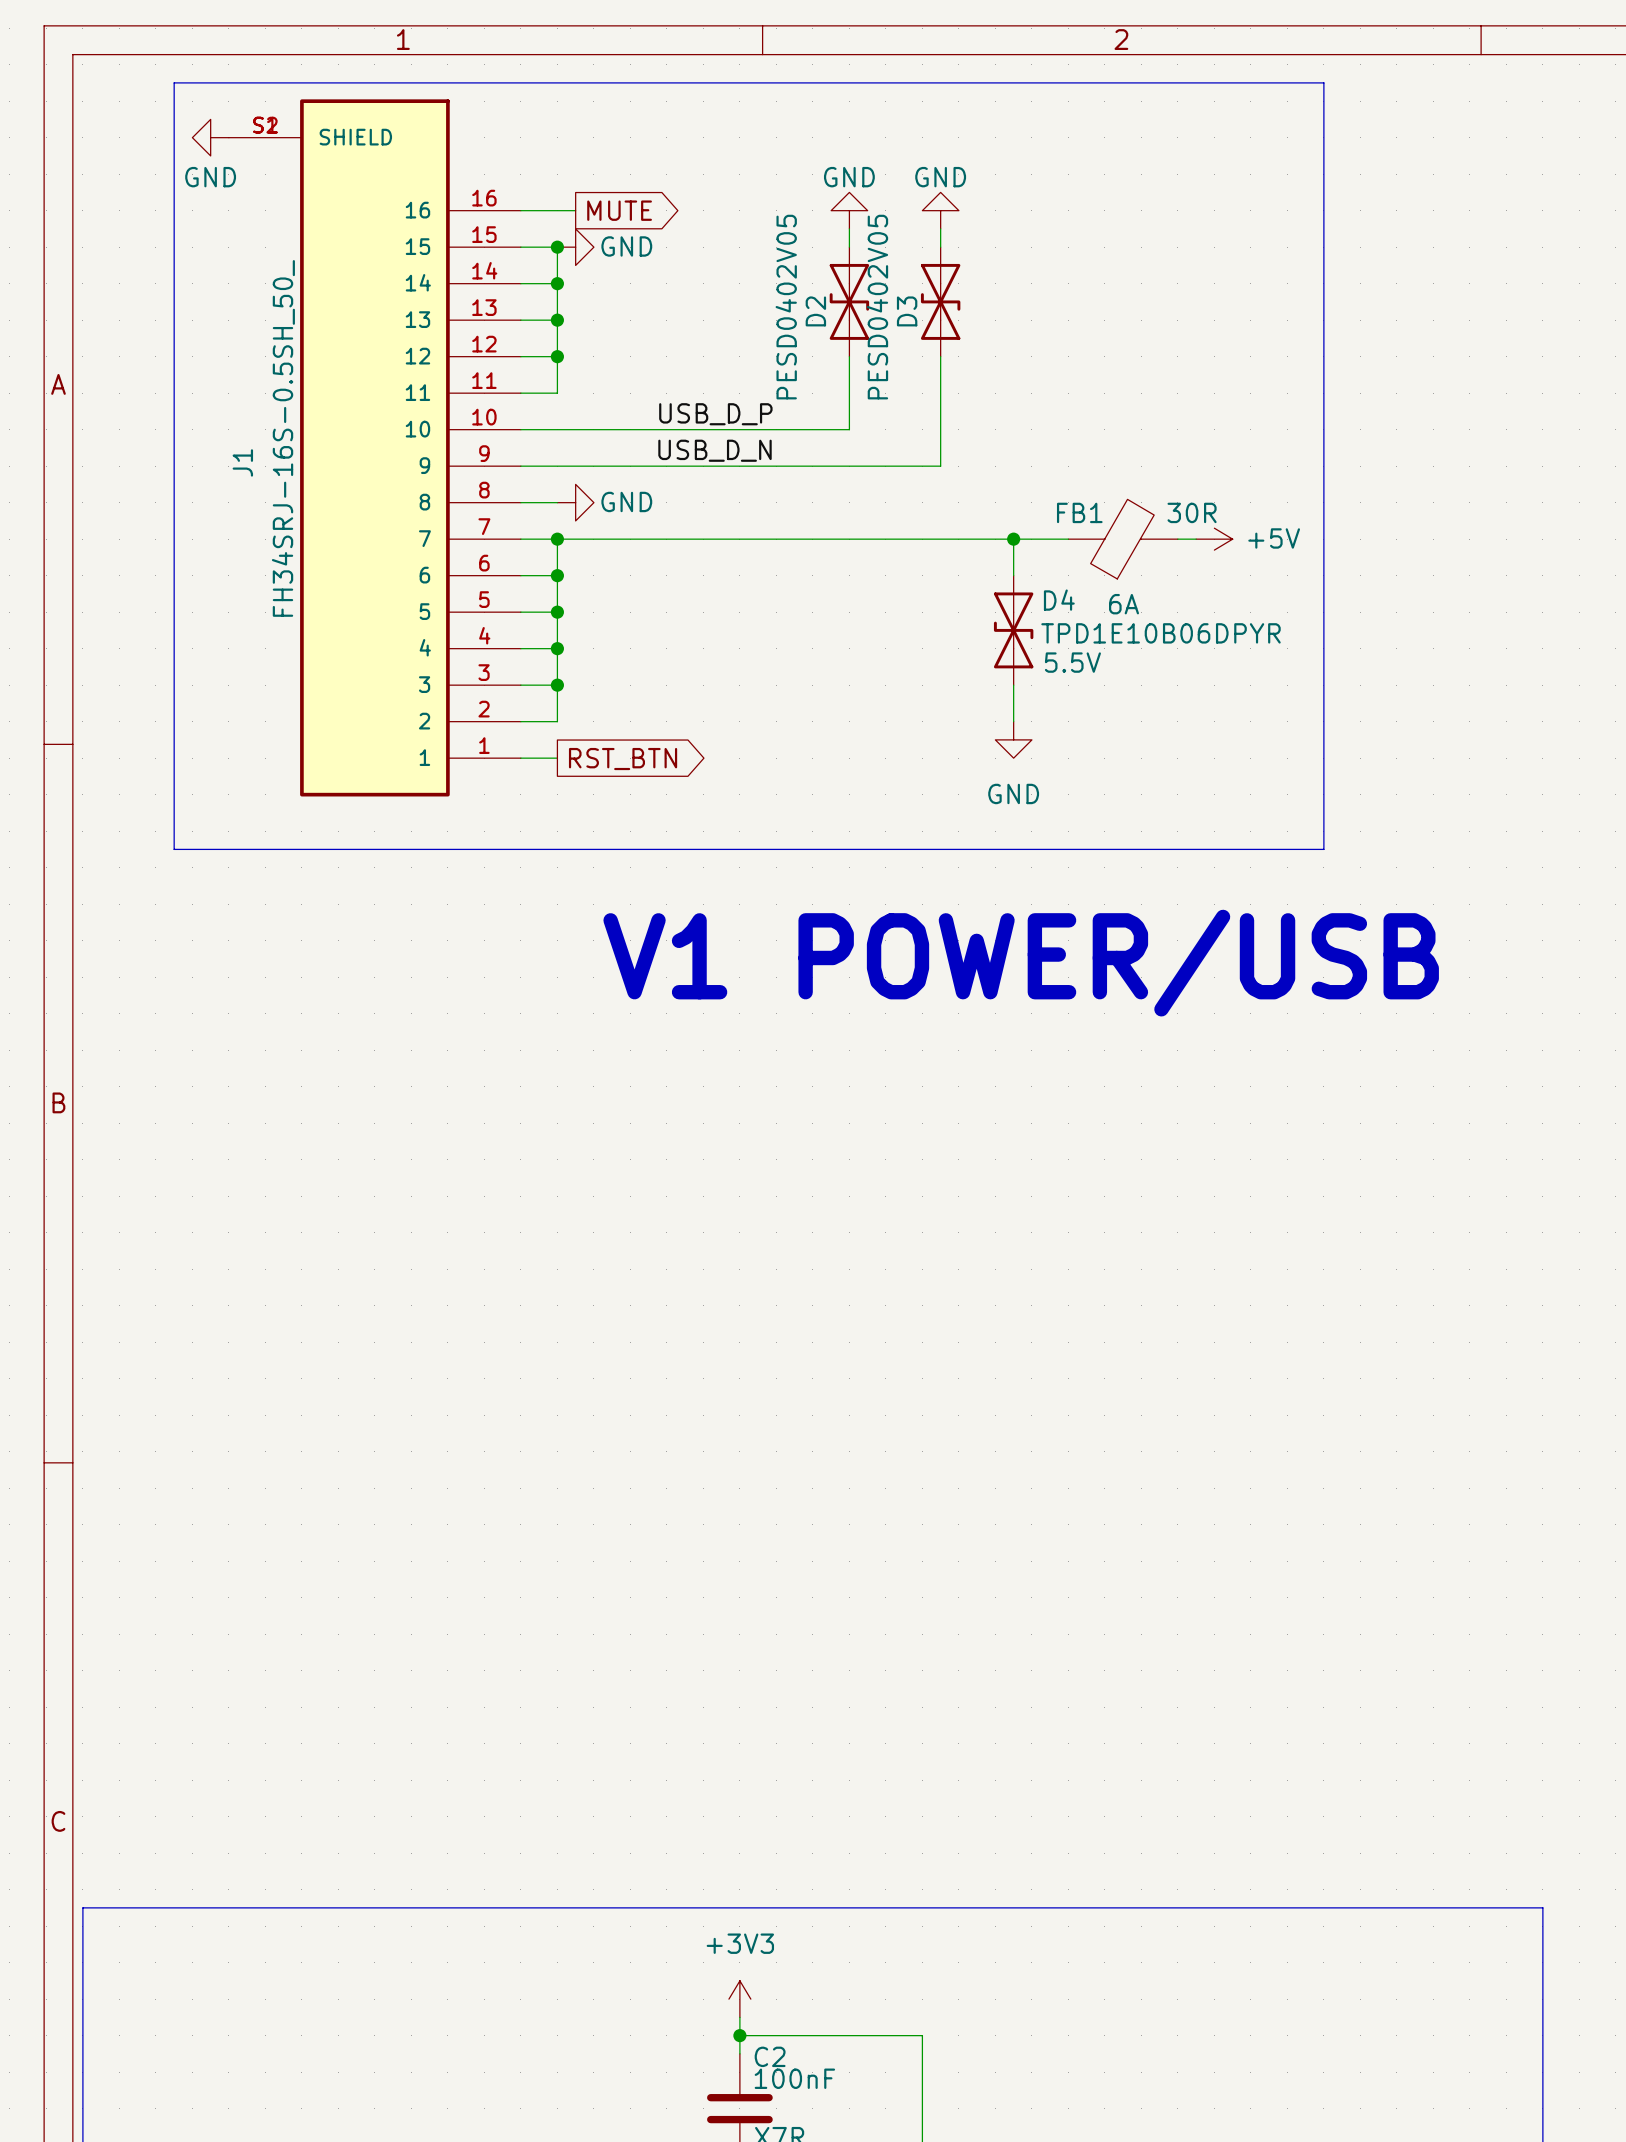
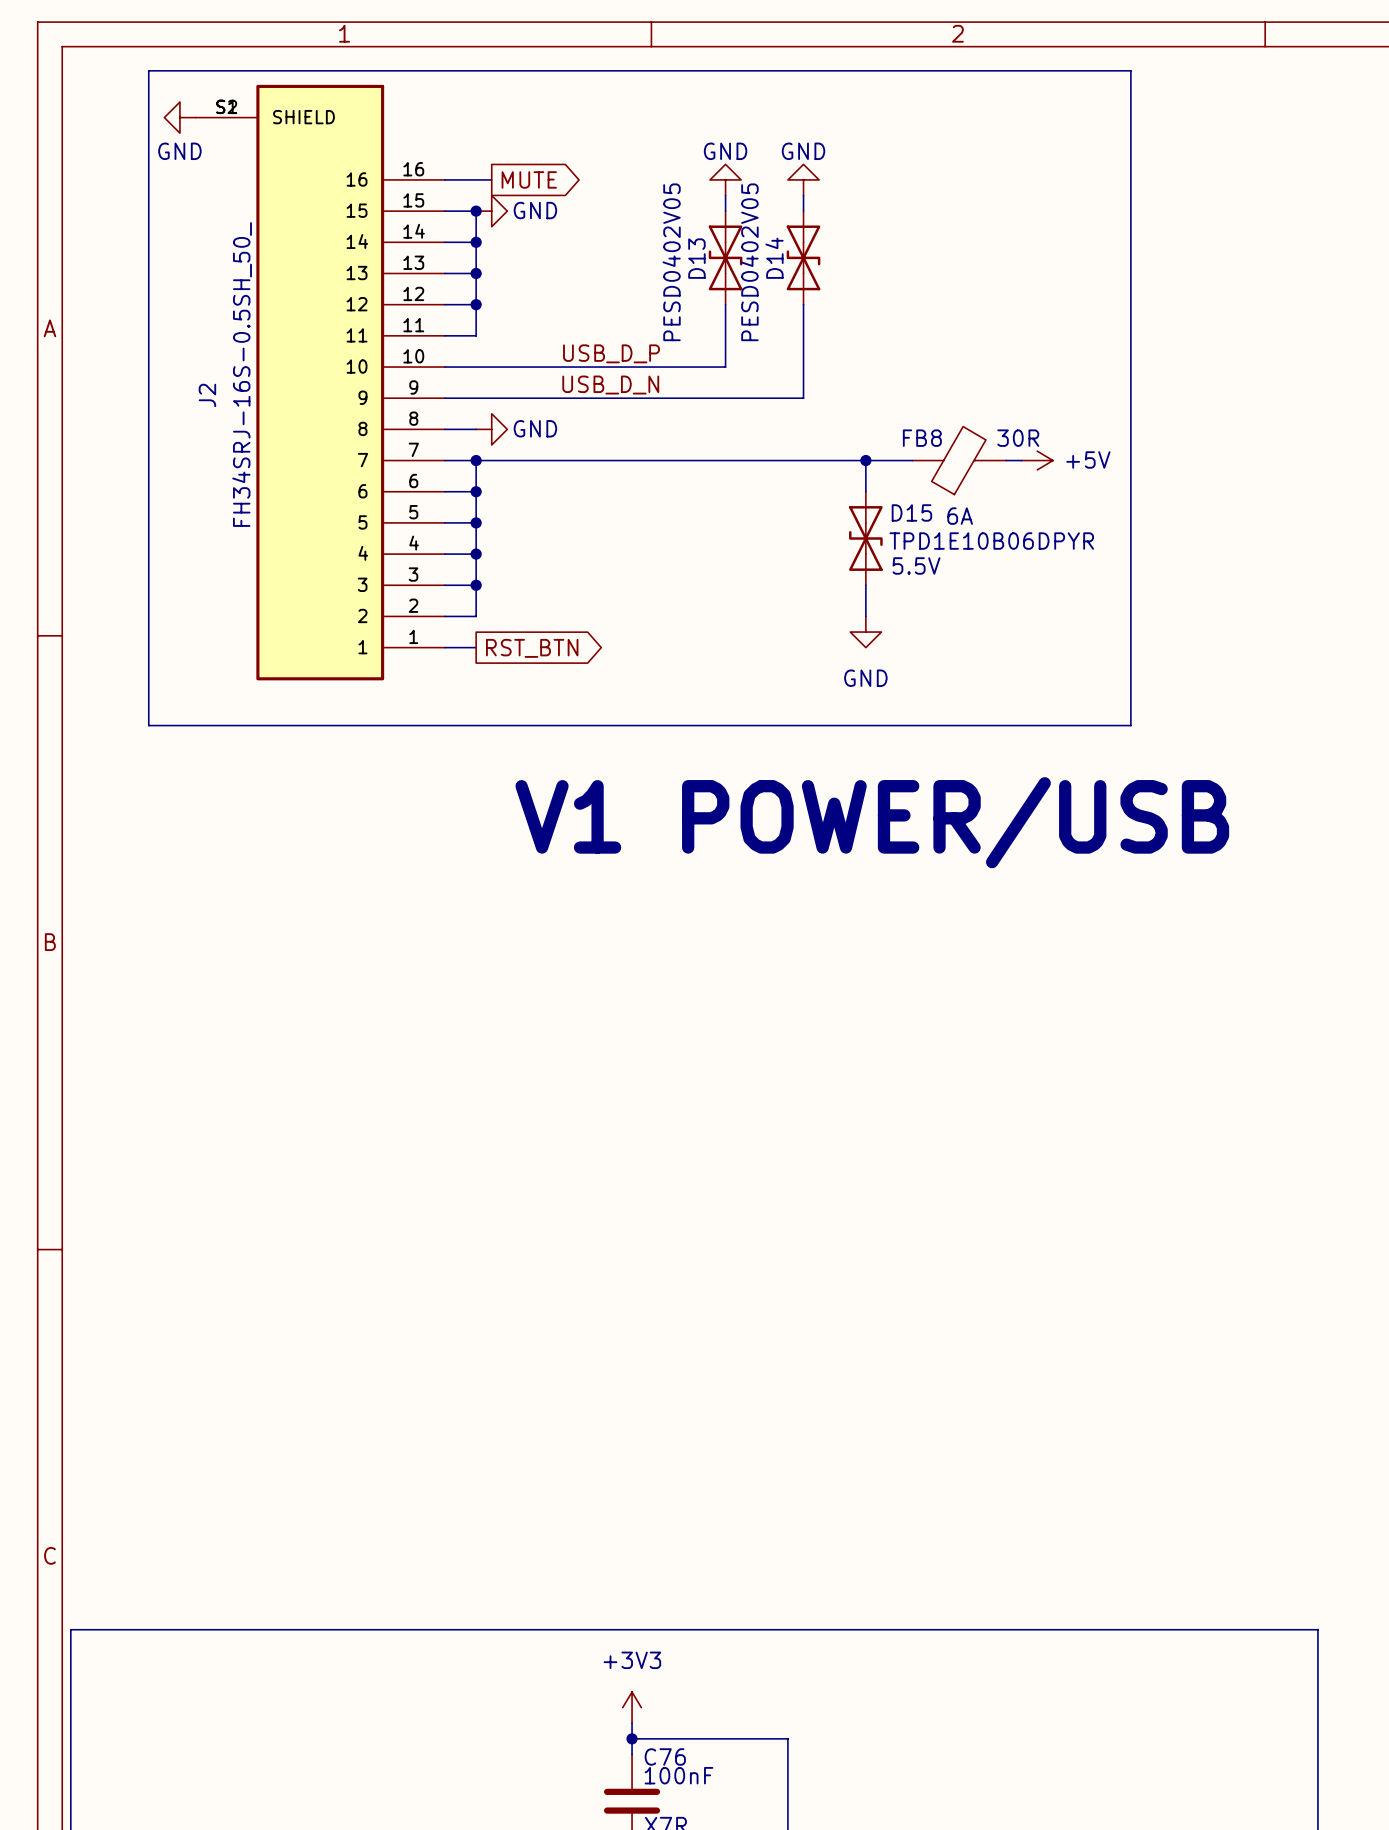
D2 name: D2 (815, 311) -> D13 (696, 258)
D3 name: D3 (907, 311) -> D14 (774, 258)
J1 name: J1 (242, 462) -> J2 (207, 395)
FB1 name: FB1 (1079, 512) -> FB8 (922, 438)
D4 name: D4 (1059, 600) -> D15 (911, 512)
C2 name: C2 (770, 2056) -> C76 (665, 1756)

